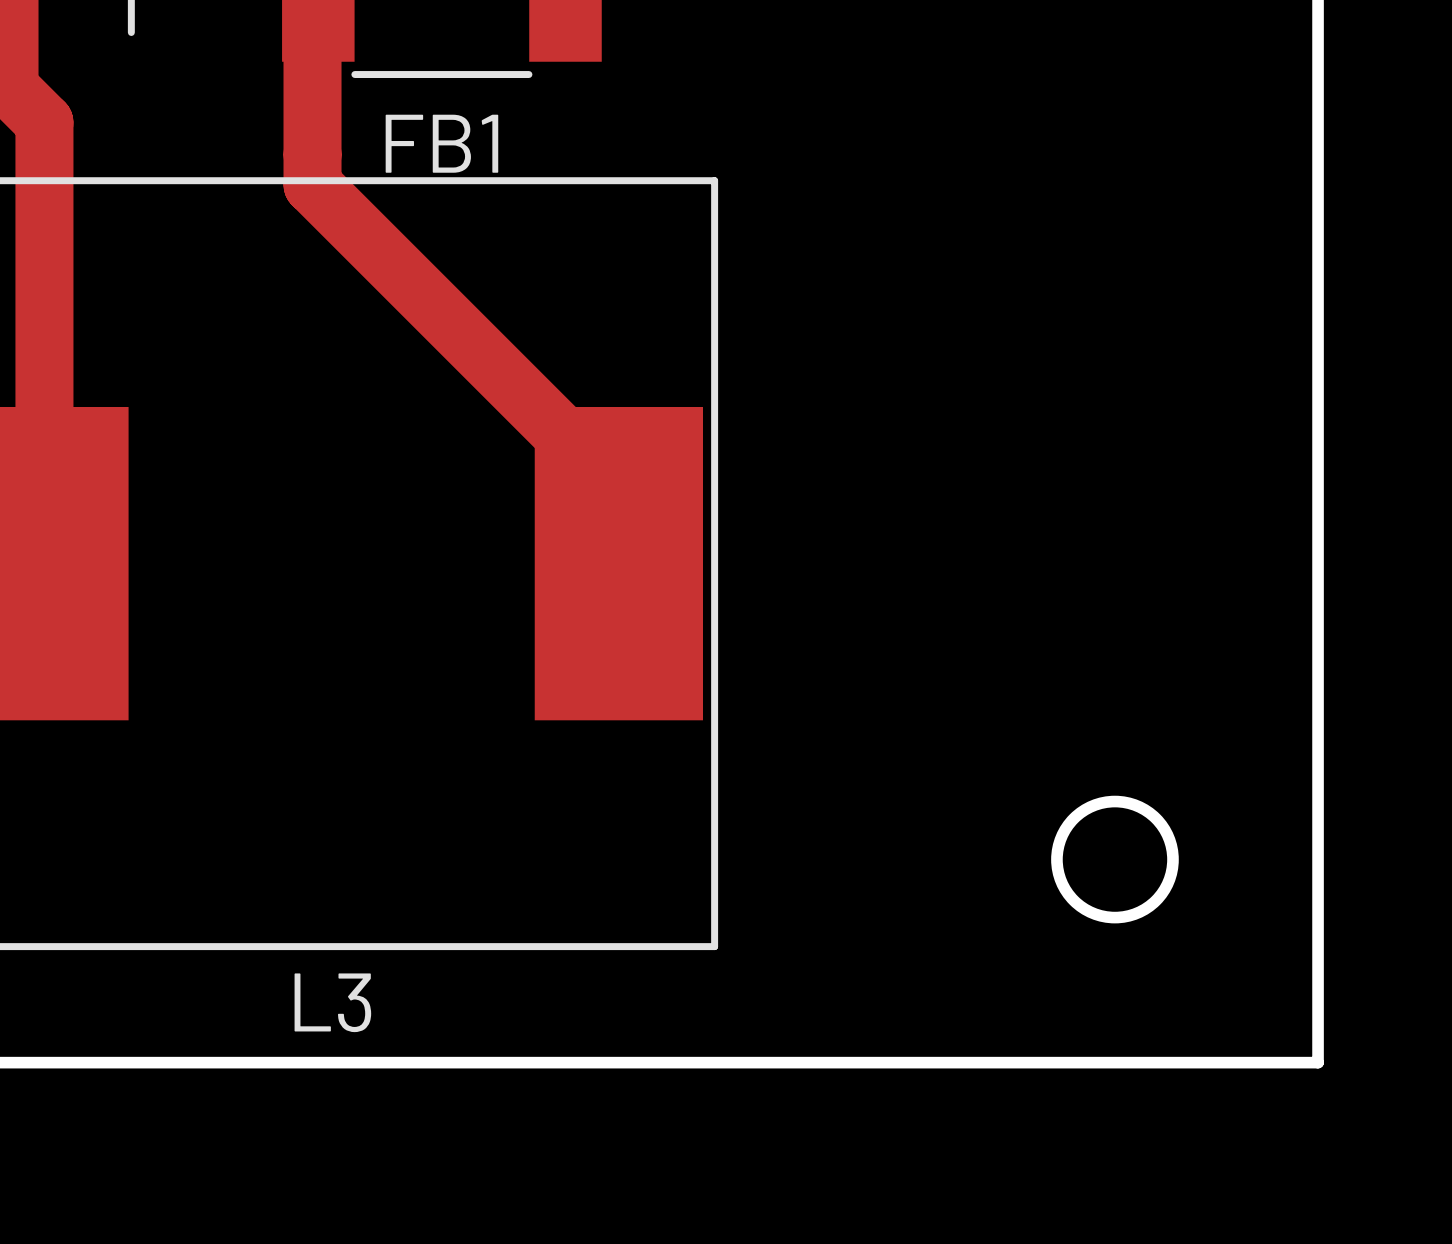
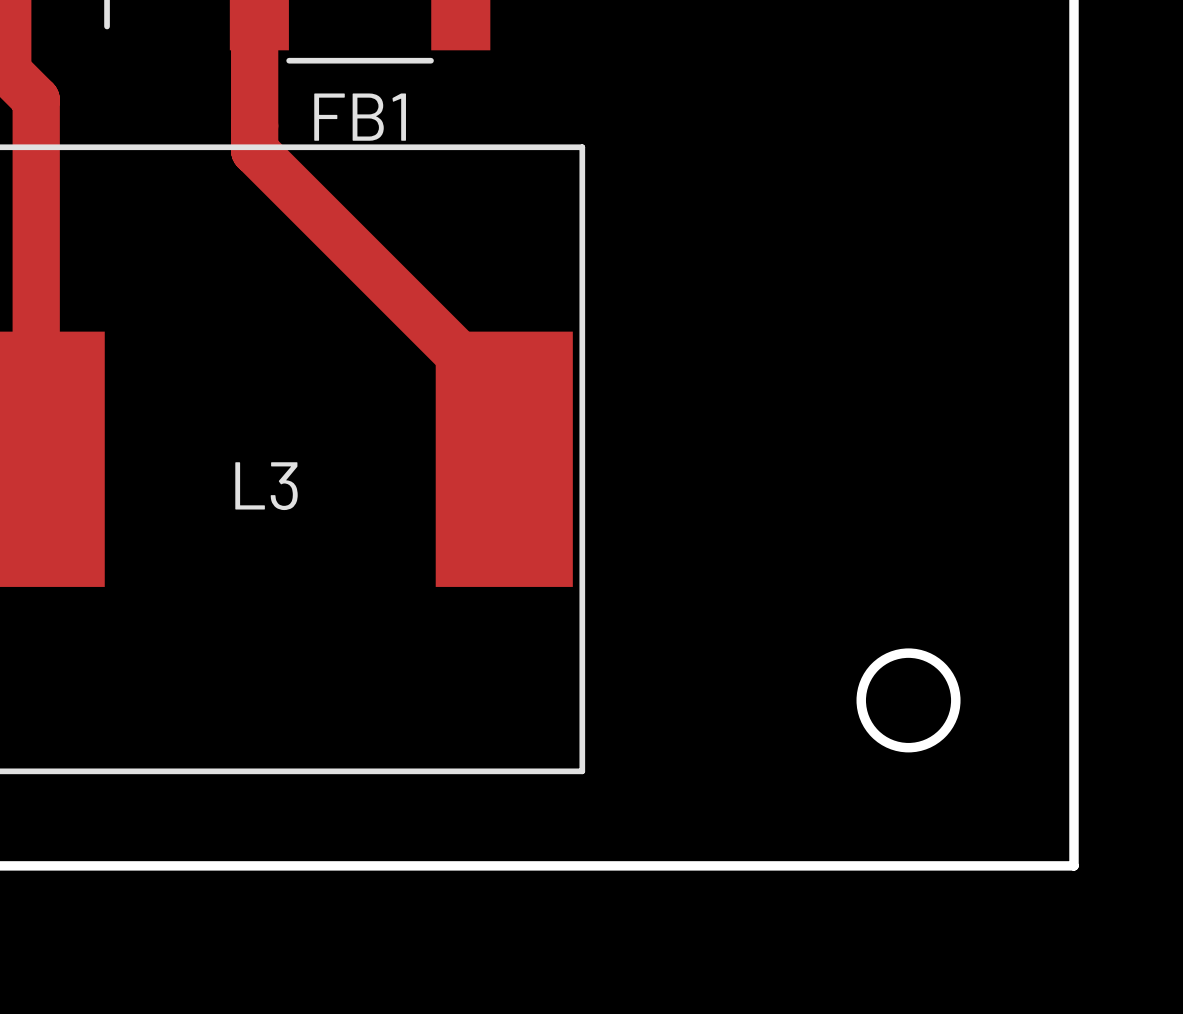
L3 name position: L3 (332, 1002) -> L3 (266, 486)

